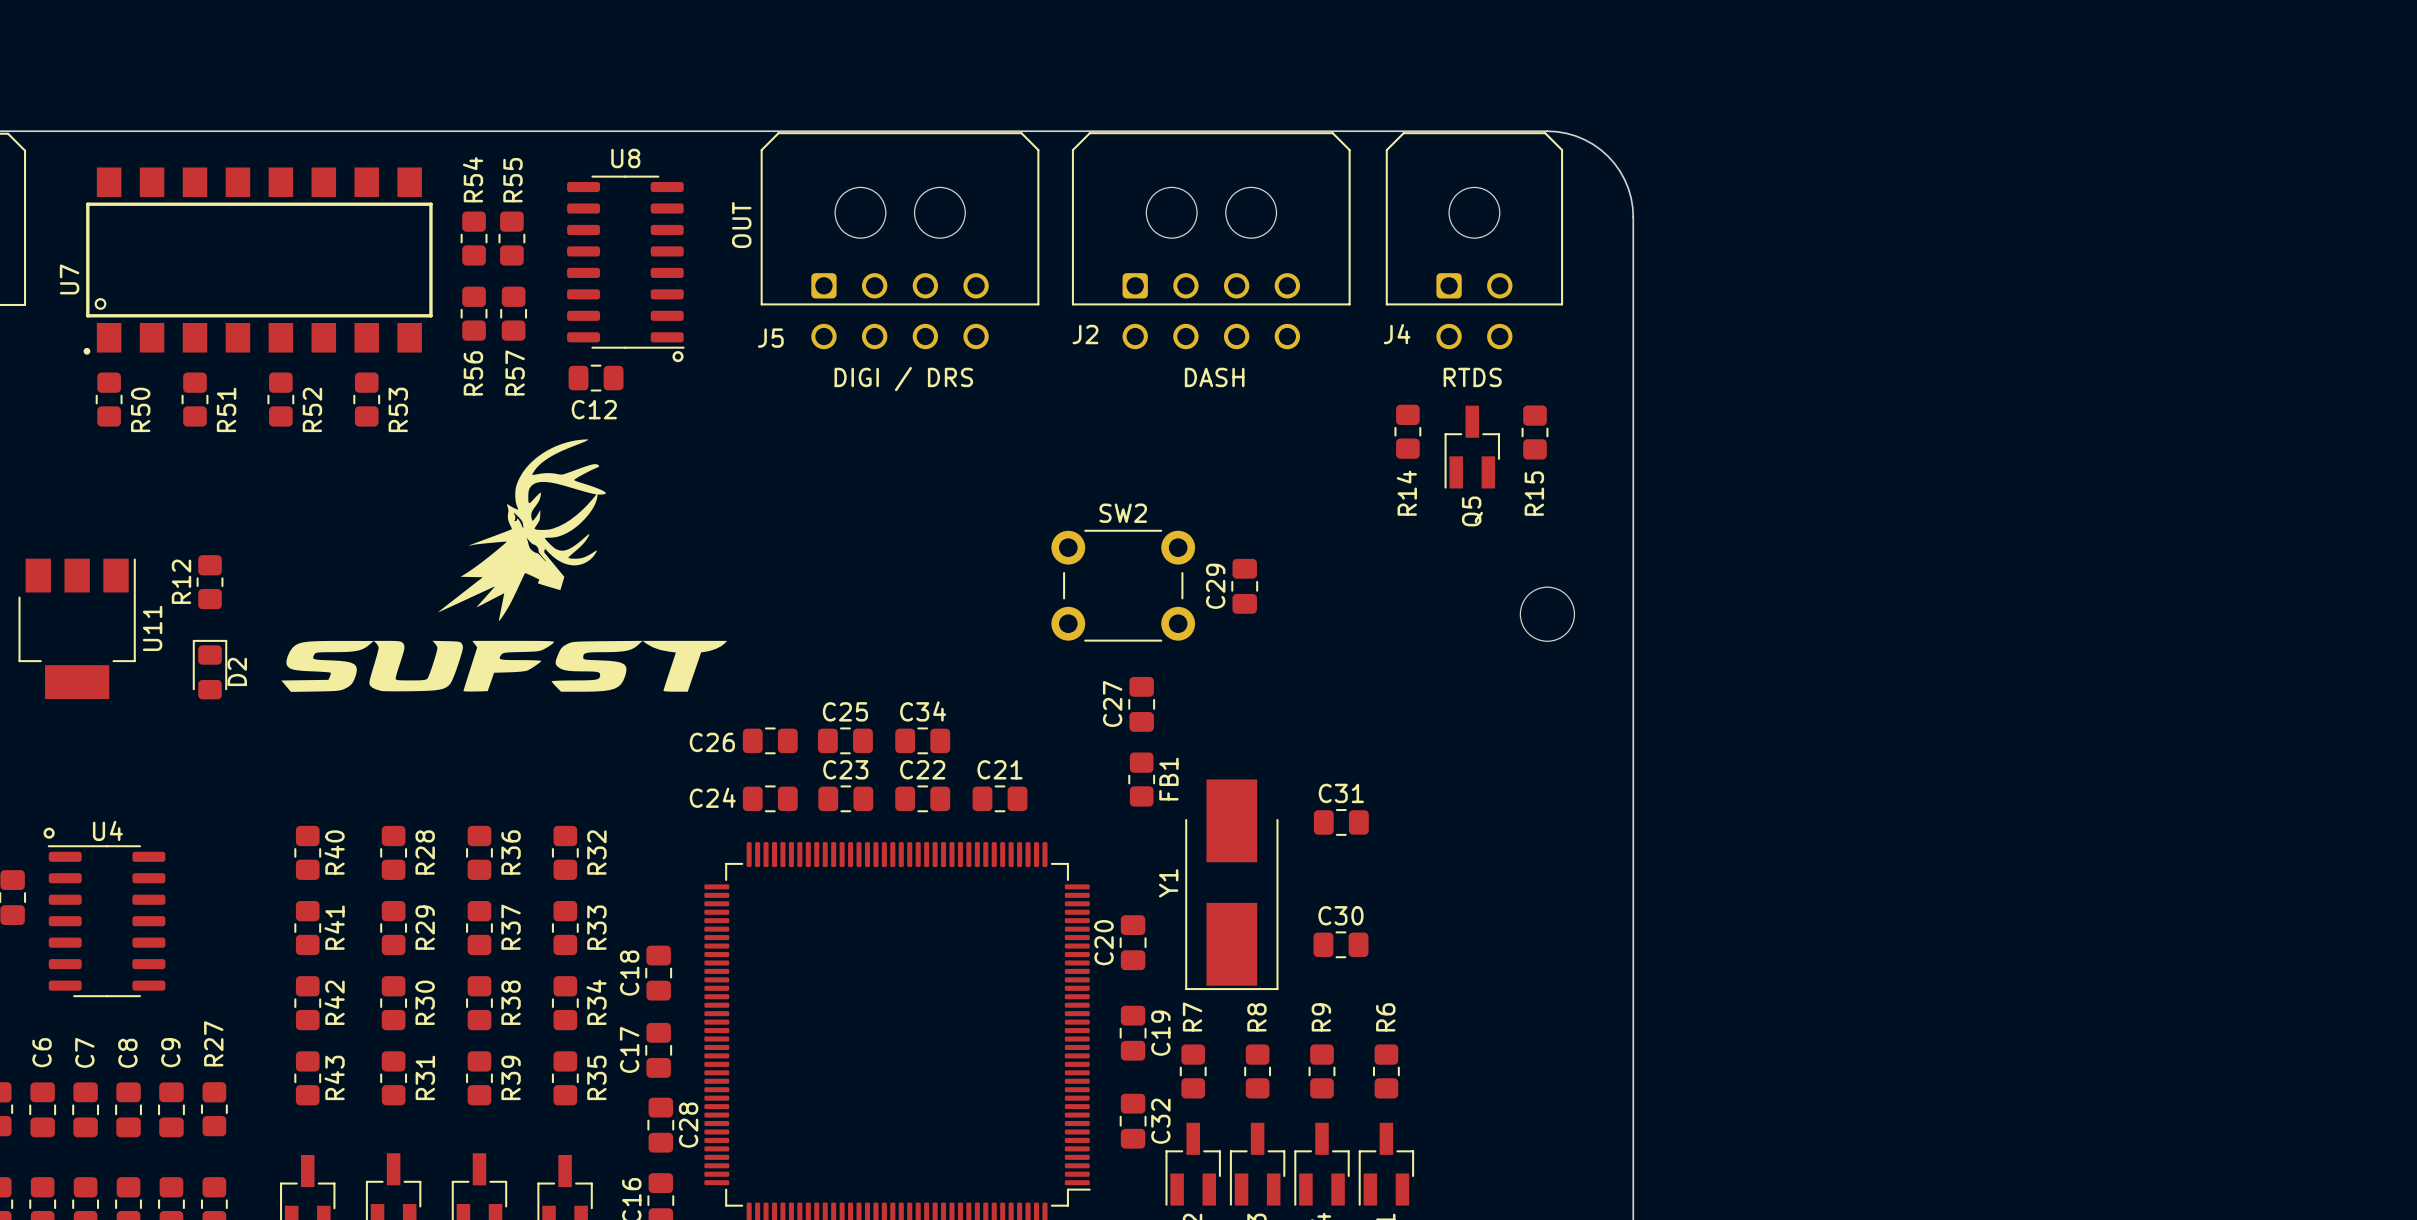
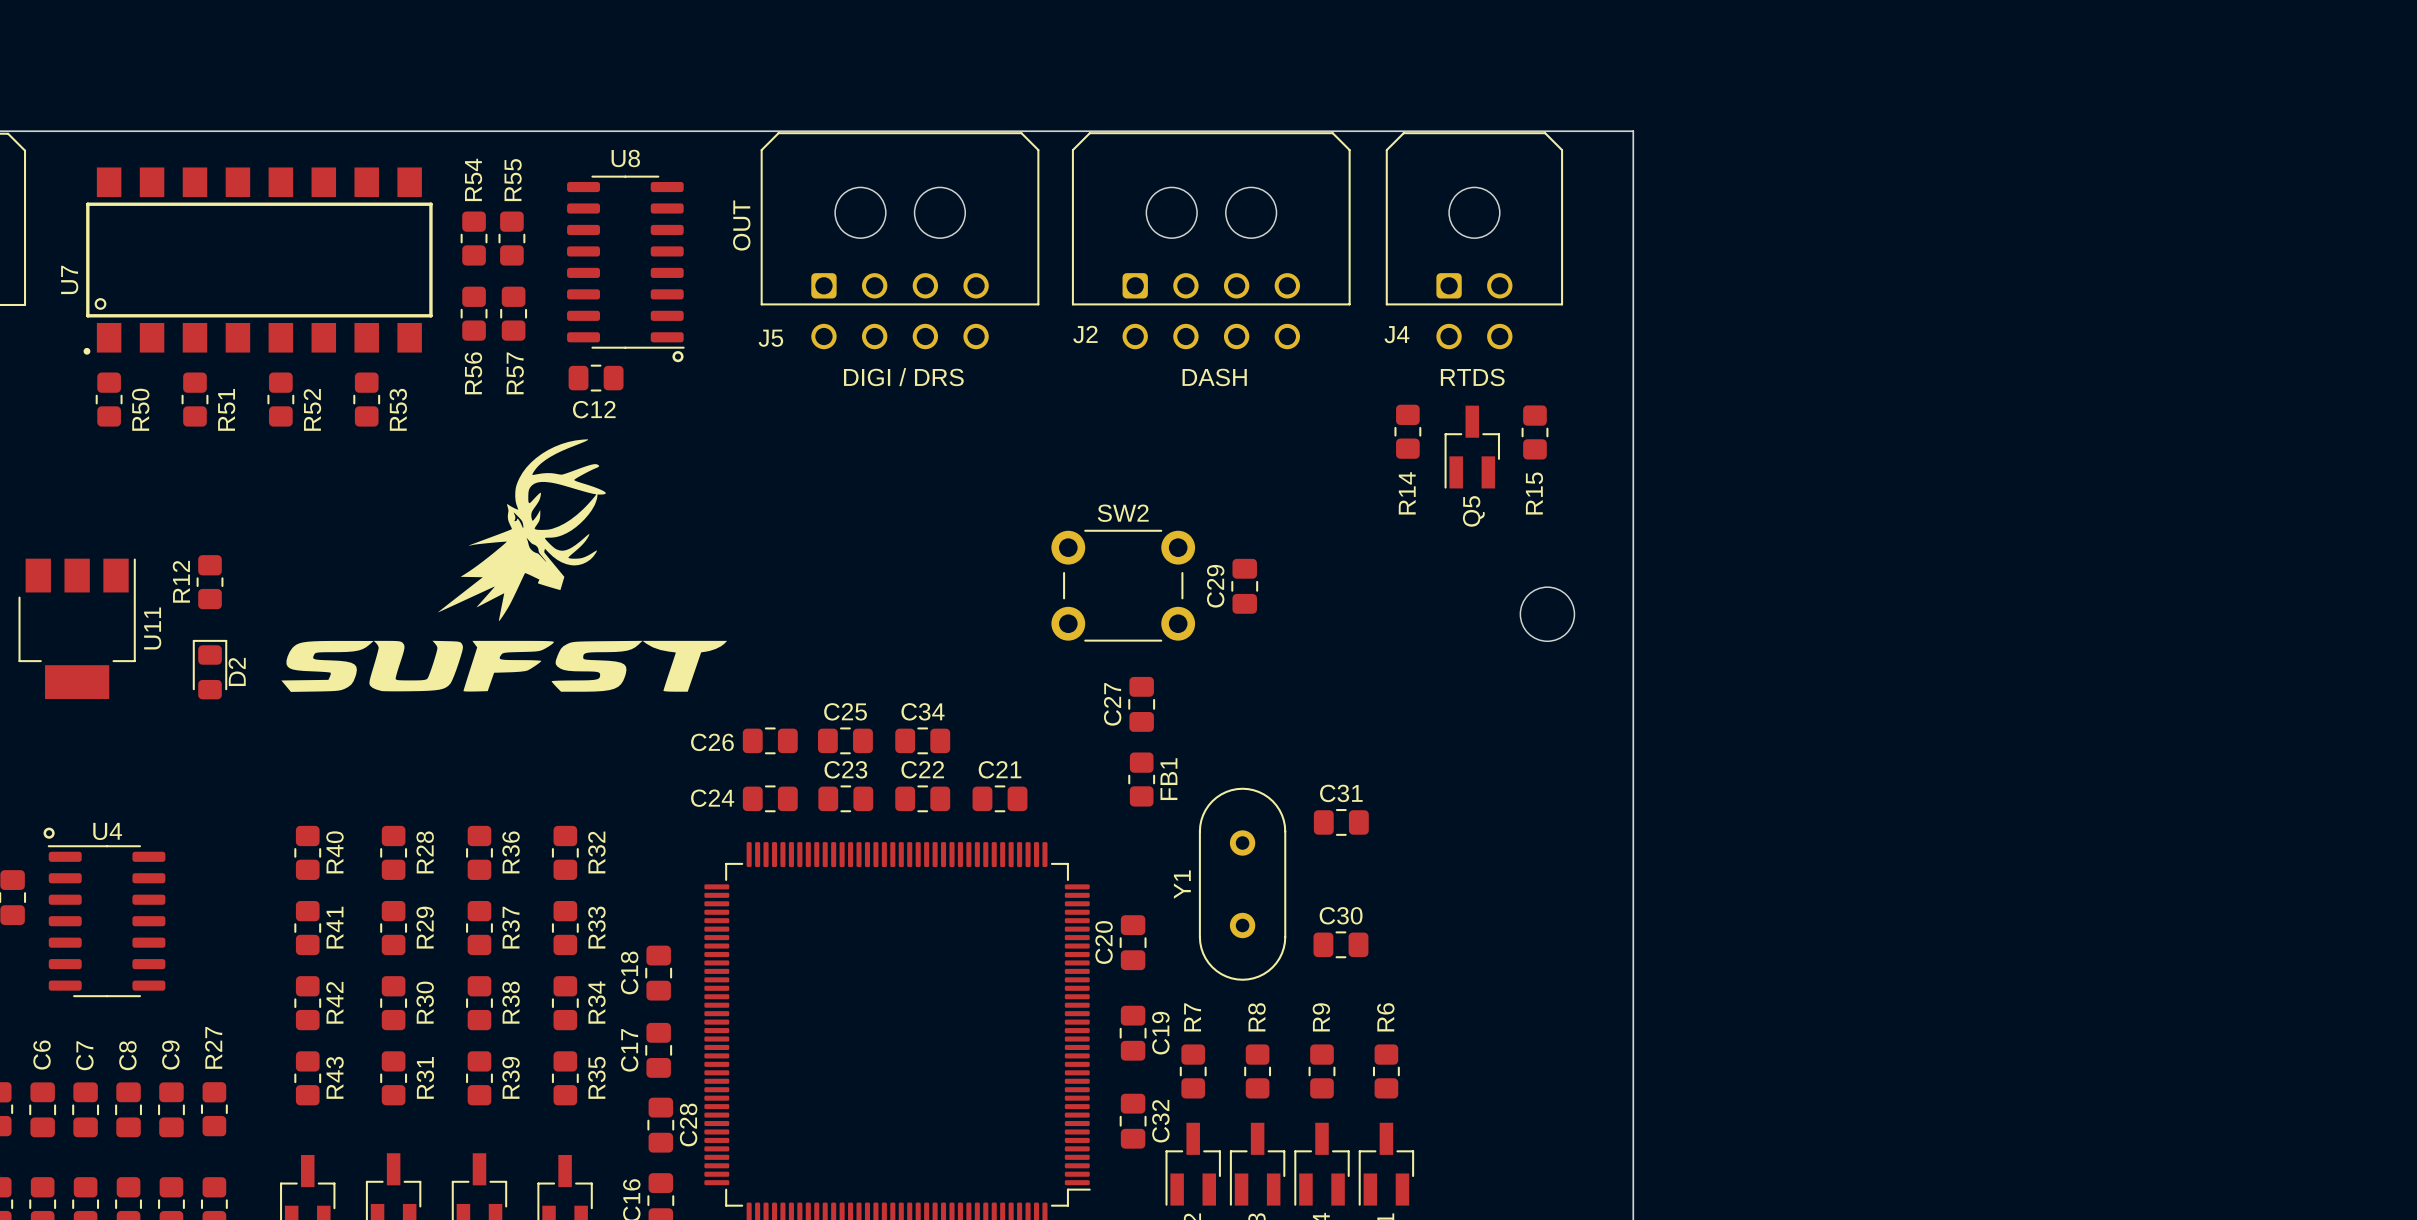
board edge: (1547, 131) (1566, 133) (1584, 139) (1608, 156) (1624, 179) (1631, 197) (1633, 217) -> (1547, 131) (1633, 131) (1633, 217)
Y1 footprint: [1185, 779, 1279, 991] -> [1198, 787, 1287, 981]

